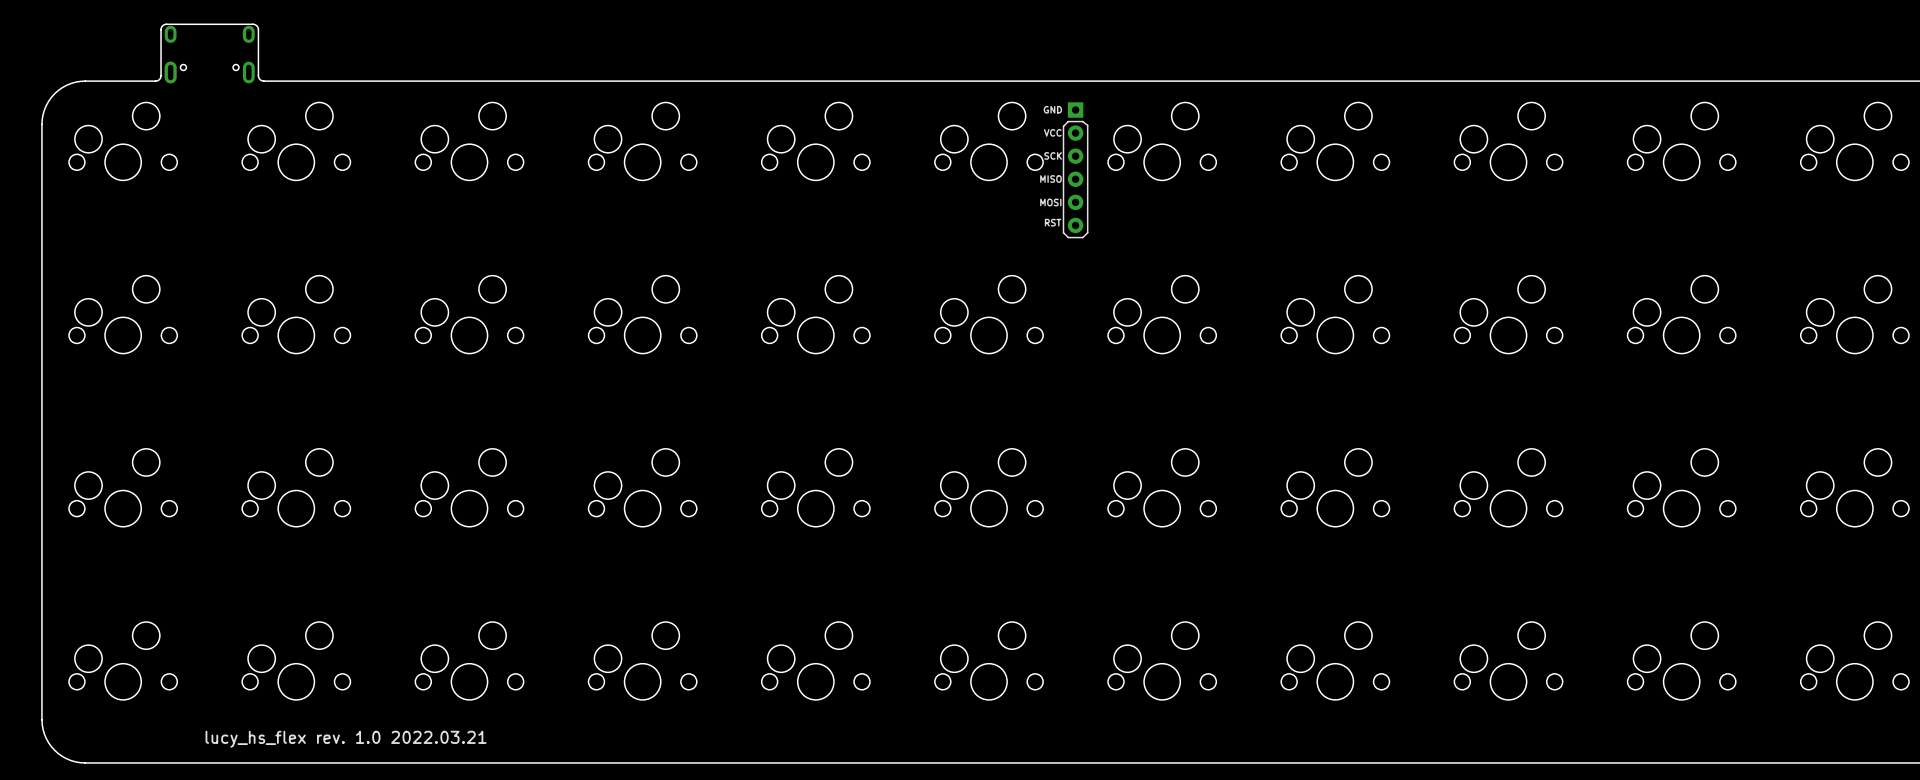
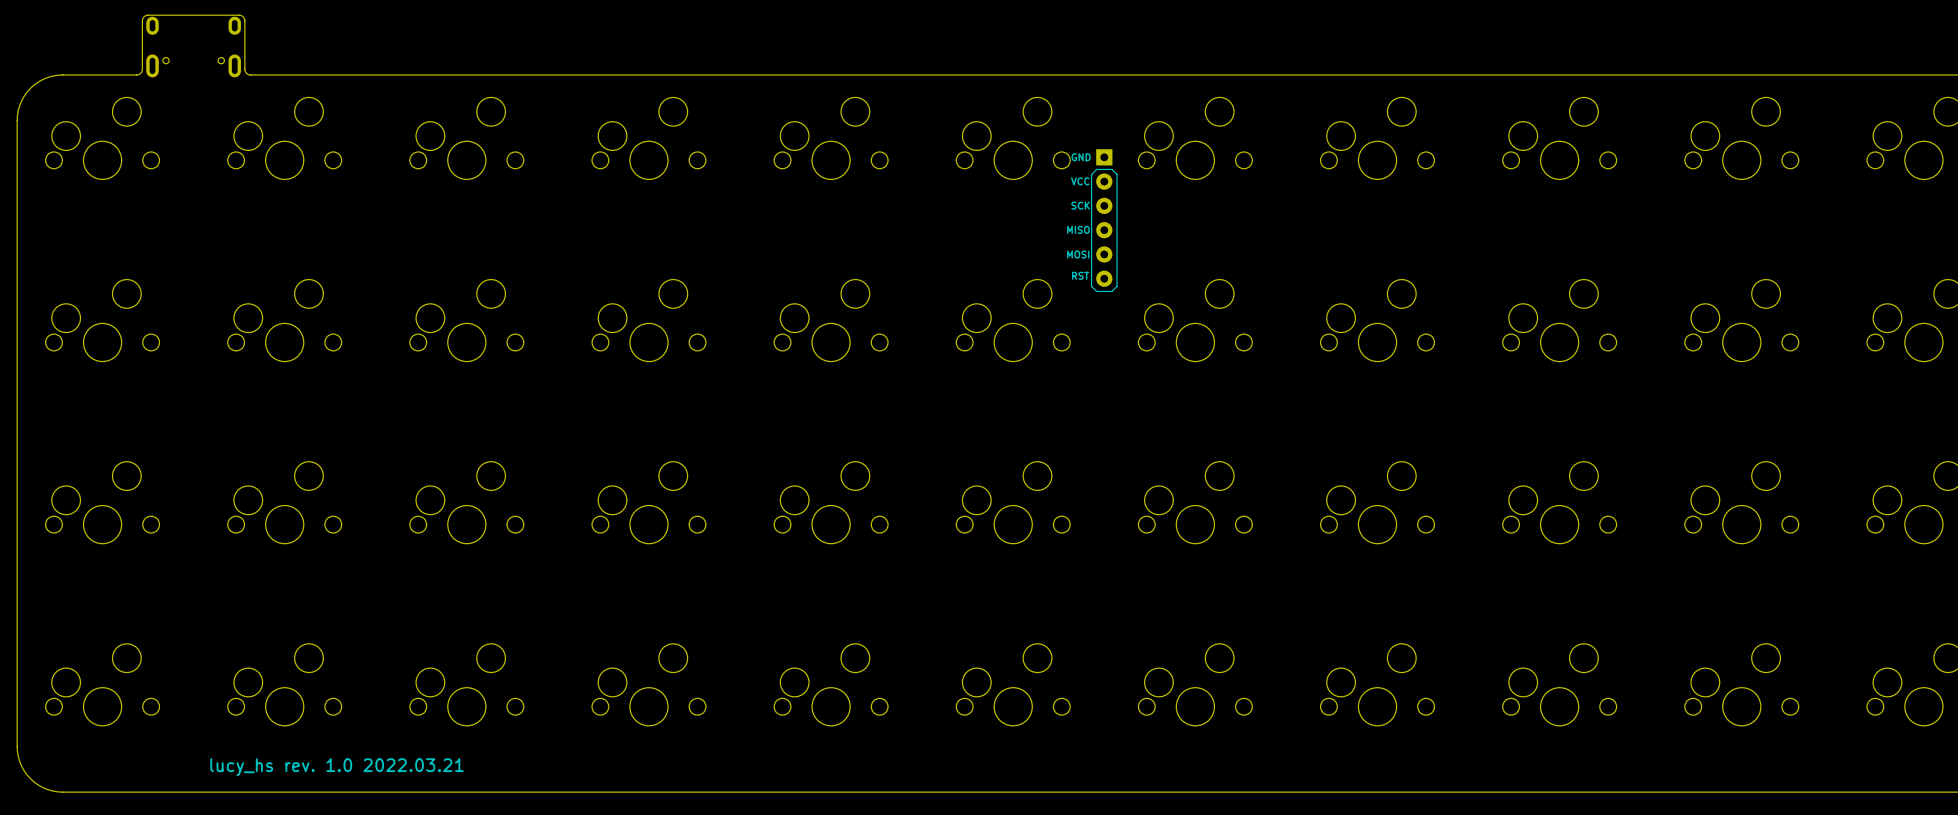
part: (1075, 170) -> none
part: none -> (1104, 220)
text: lucy_hs_flex rev. 1.0 2022.03.21 (346, 739) -> lucy_hs rev. 1.0 2022.03.21 (337, 767)

